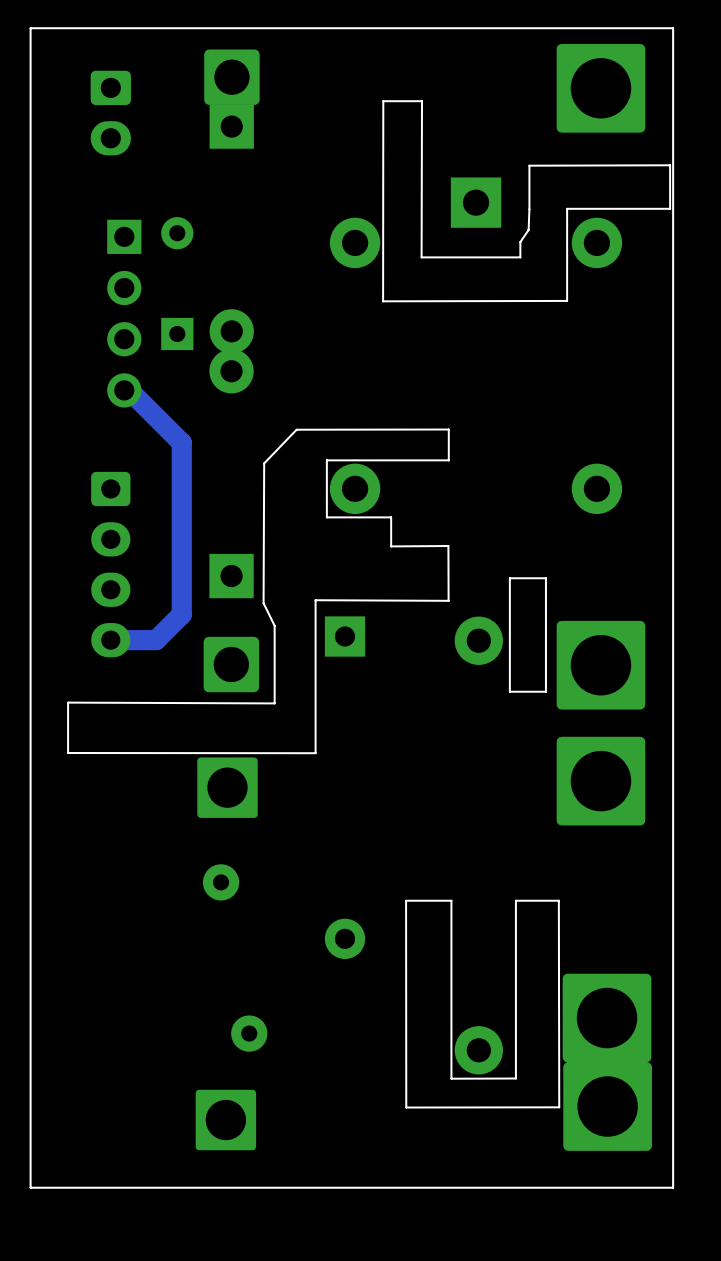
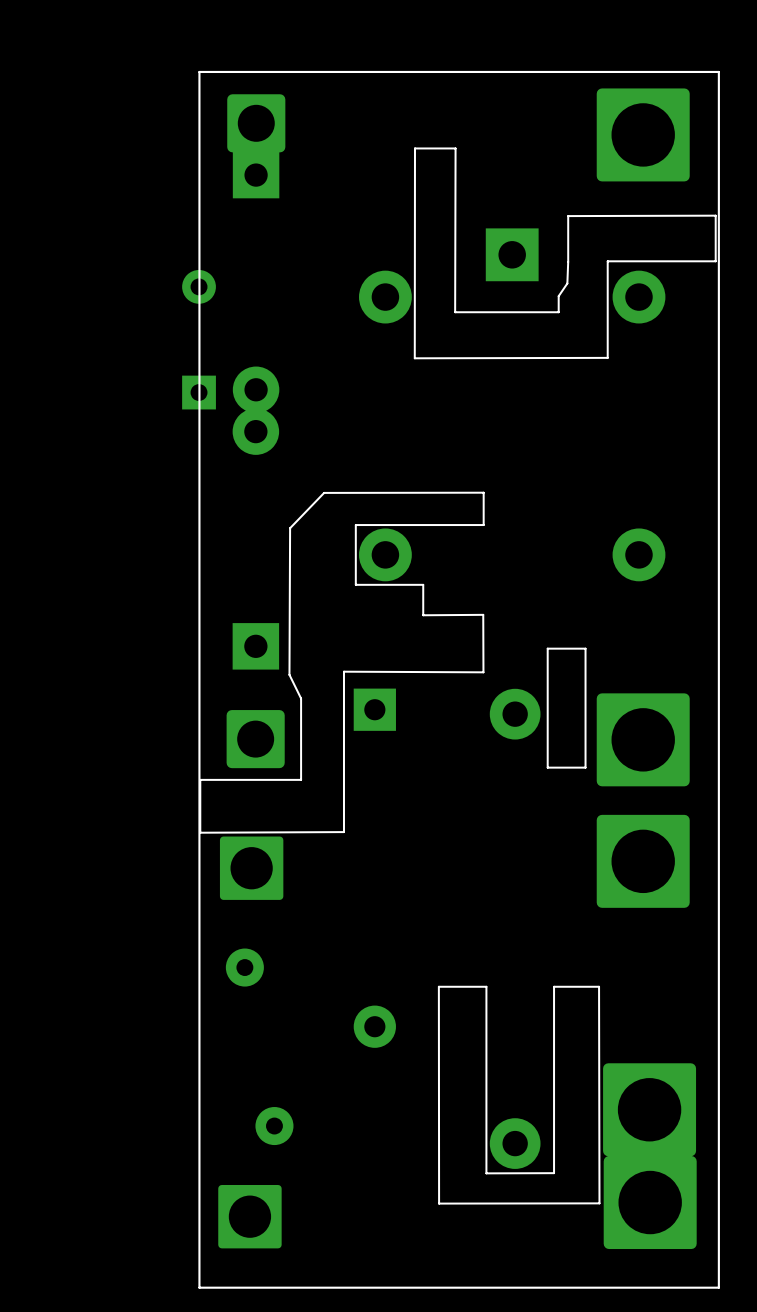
board edge: (177, 28) (30, 28) (30, 1187) (177, 1187) -> (199, 71) (199, 1287)
part: (110, 113) -> none
part: (124, 313) -> none
track: (129, 390) (181, 442) (181, 614) (156, 640) (110, 640) -> none
part: (110, 564) -> none
board edge: (274, 703) (68, 702) (68, 753) (315, 753) -> (301, 779) (200, 779) (200, 832) (343, 832)

